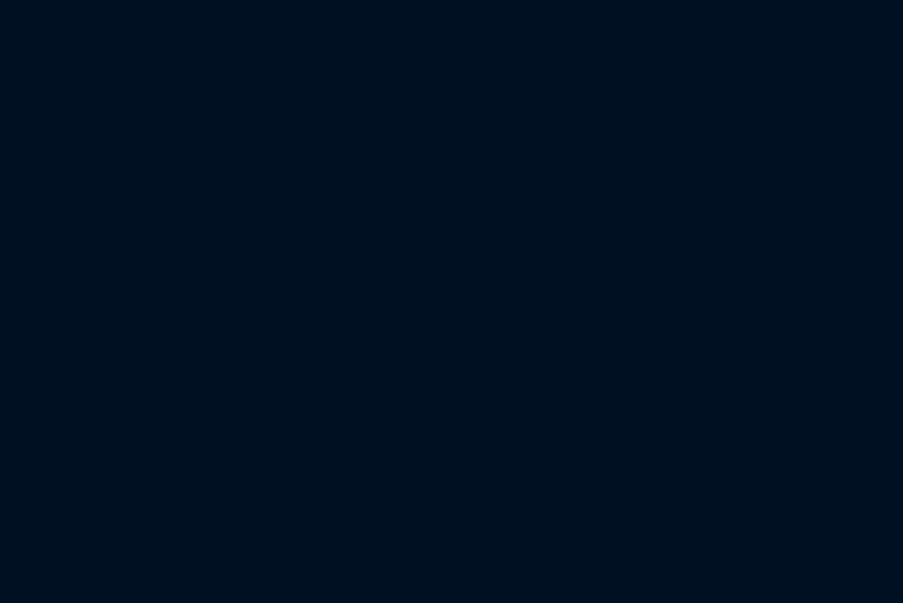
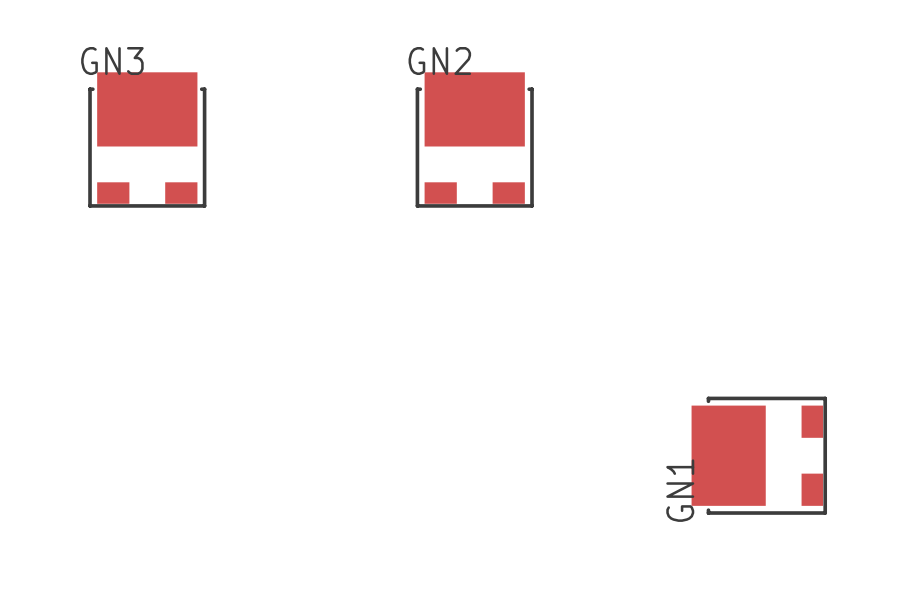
GN3: none -> (147, 140)
GN2: none -> (474, 140)
GN1: none -> (759, 455)

